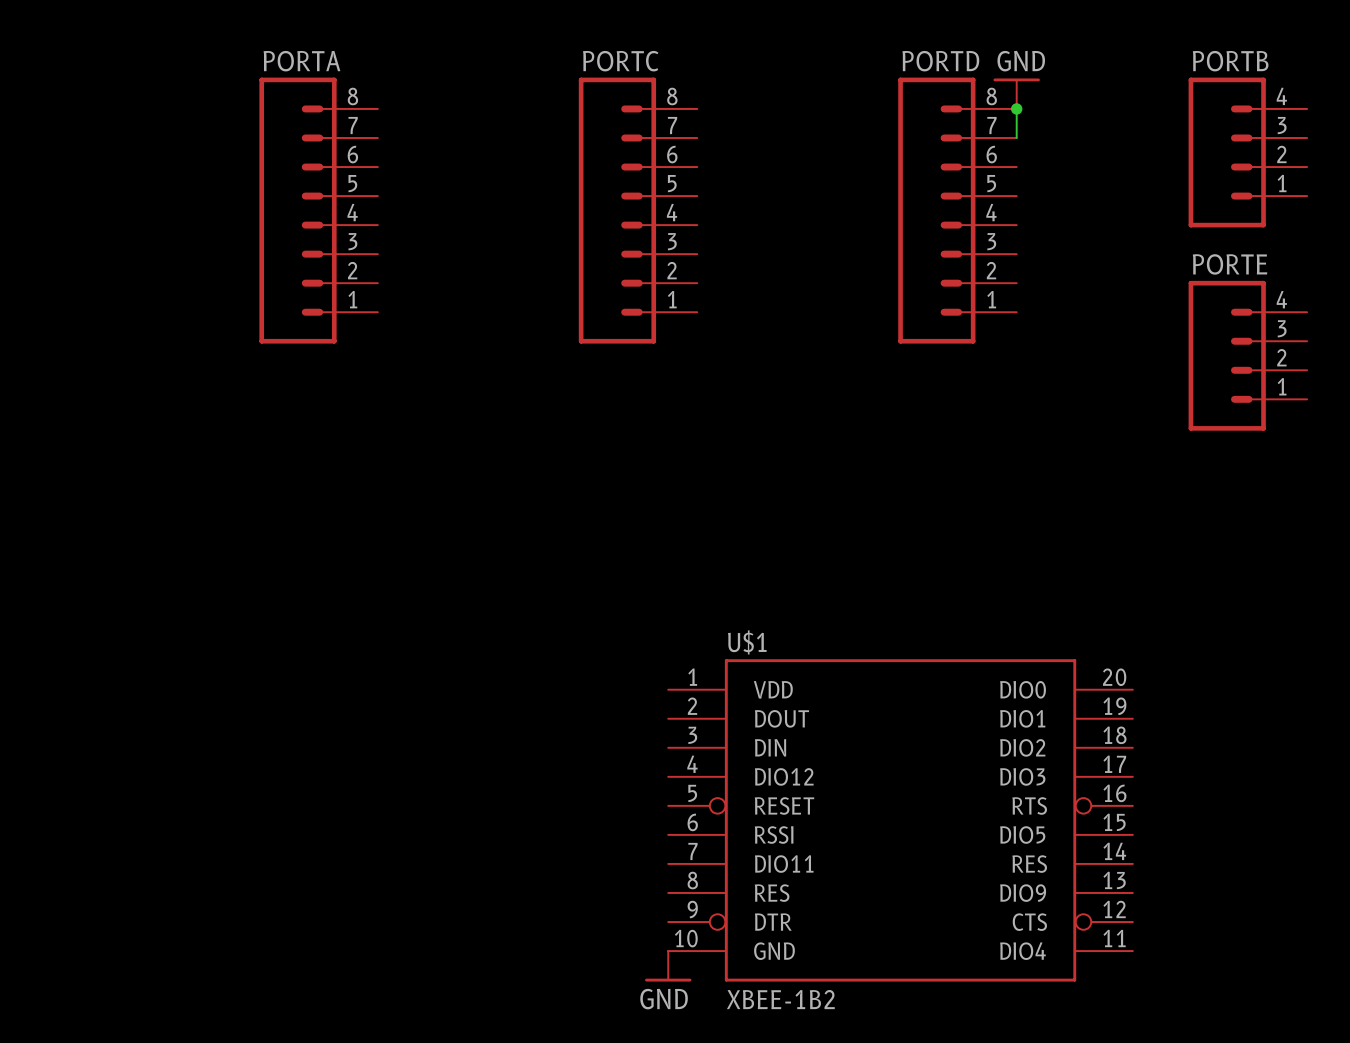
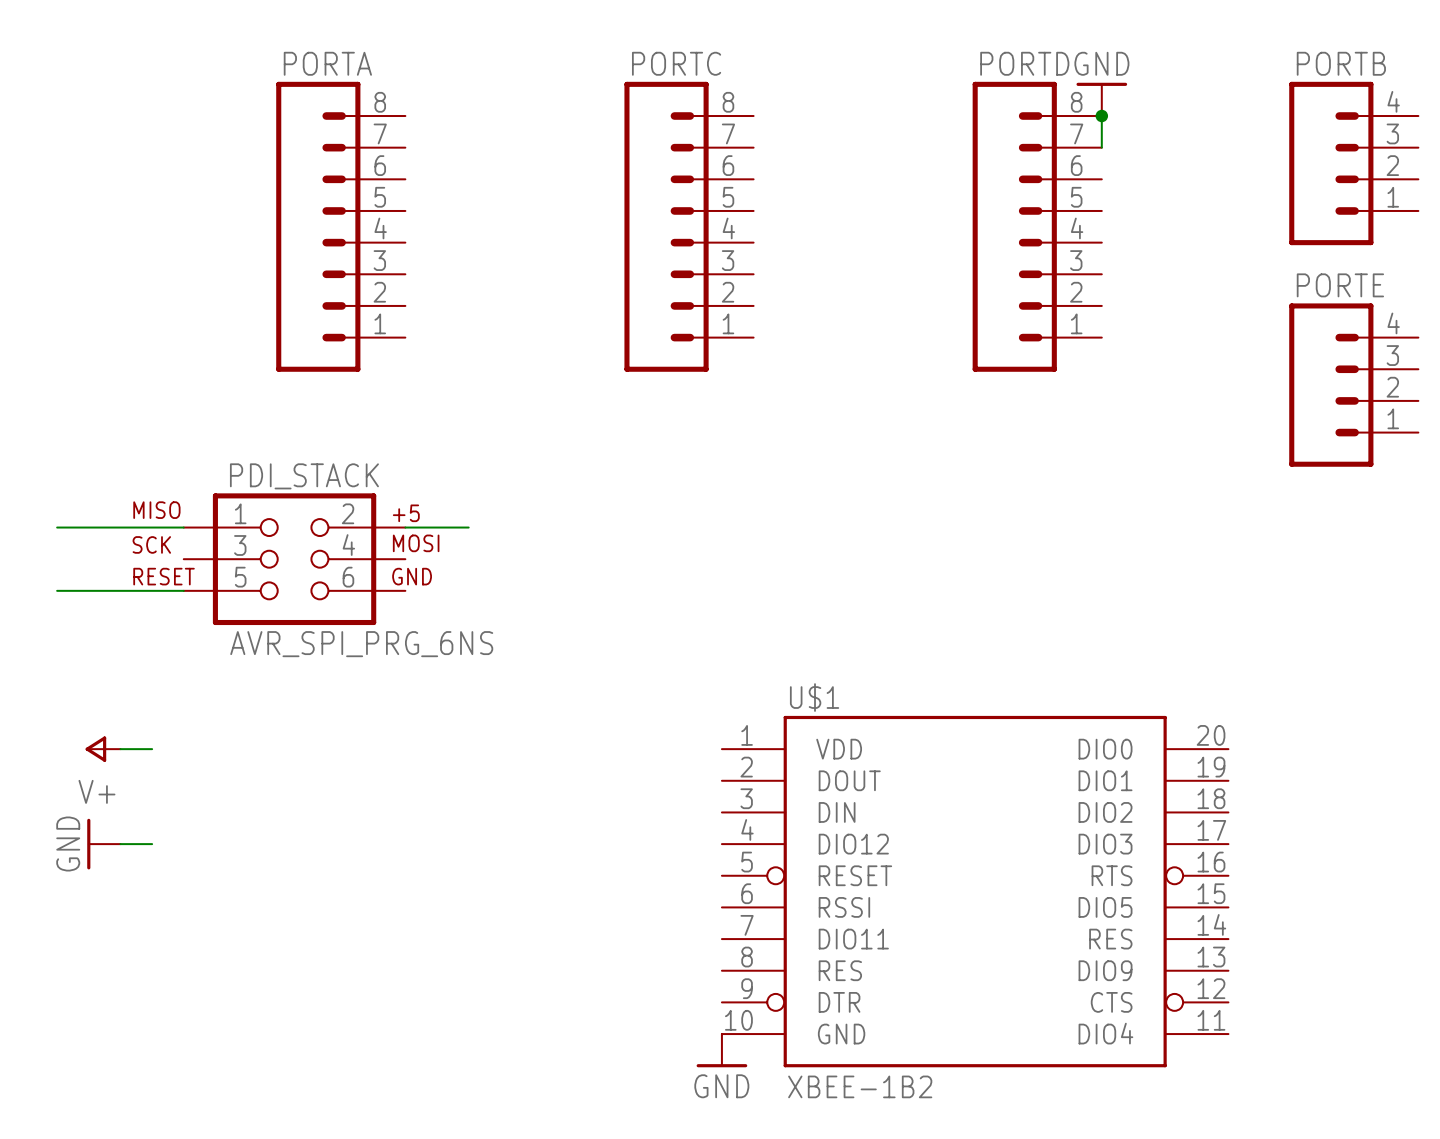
wire: none -> (57, 527) (183, 527)
wire: none -> (405, 527) (468, 527)
PDI_STACK: none -> AVR_SPI_PRG_6NS (294, 559)
wire: none -> (57, 590) (183, 590)
power symbol: none -> V+ (103, 749)
wire: none -> (120, 749) (152, 749)
power symbol: none -> GND (103, 844)
wire: none -> (120, 844) (152, 844)

